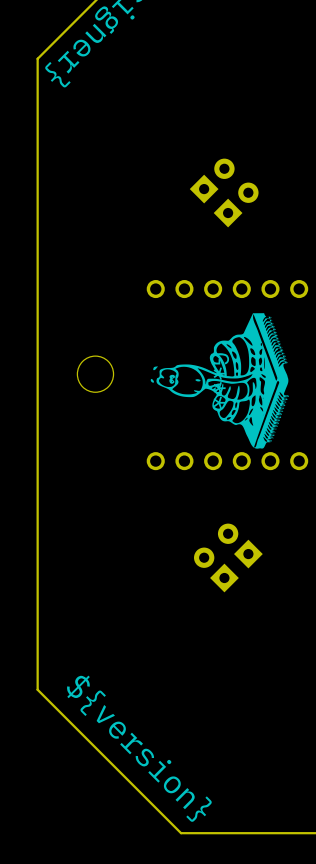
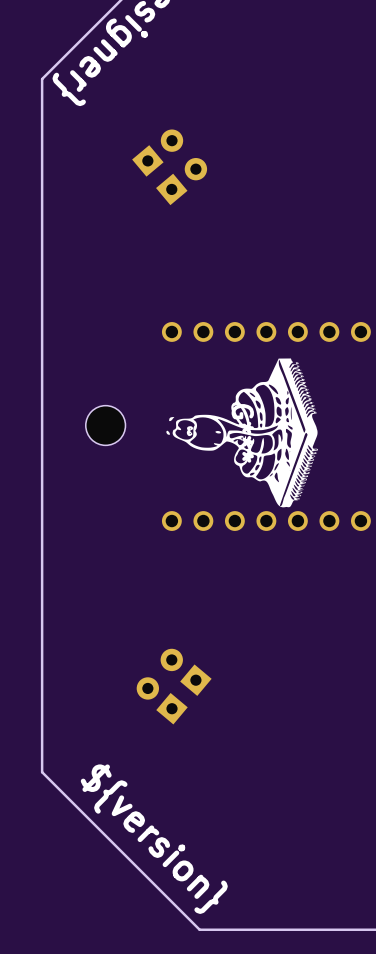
part: none -> (157, 153)
part: none -> (181, 181)
part: (212, 181) -> none
part: (236, 204) -> none
part: (240, 546) -> none
part: (216, 569) -> none
part: none -> (186, 672)
part: none -> (162, 700)

